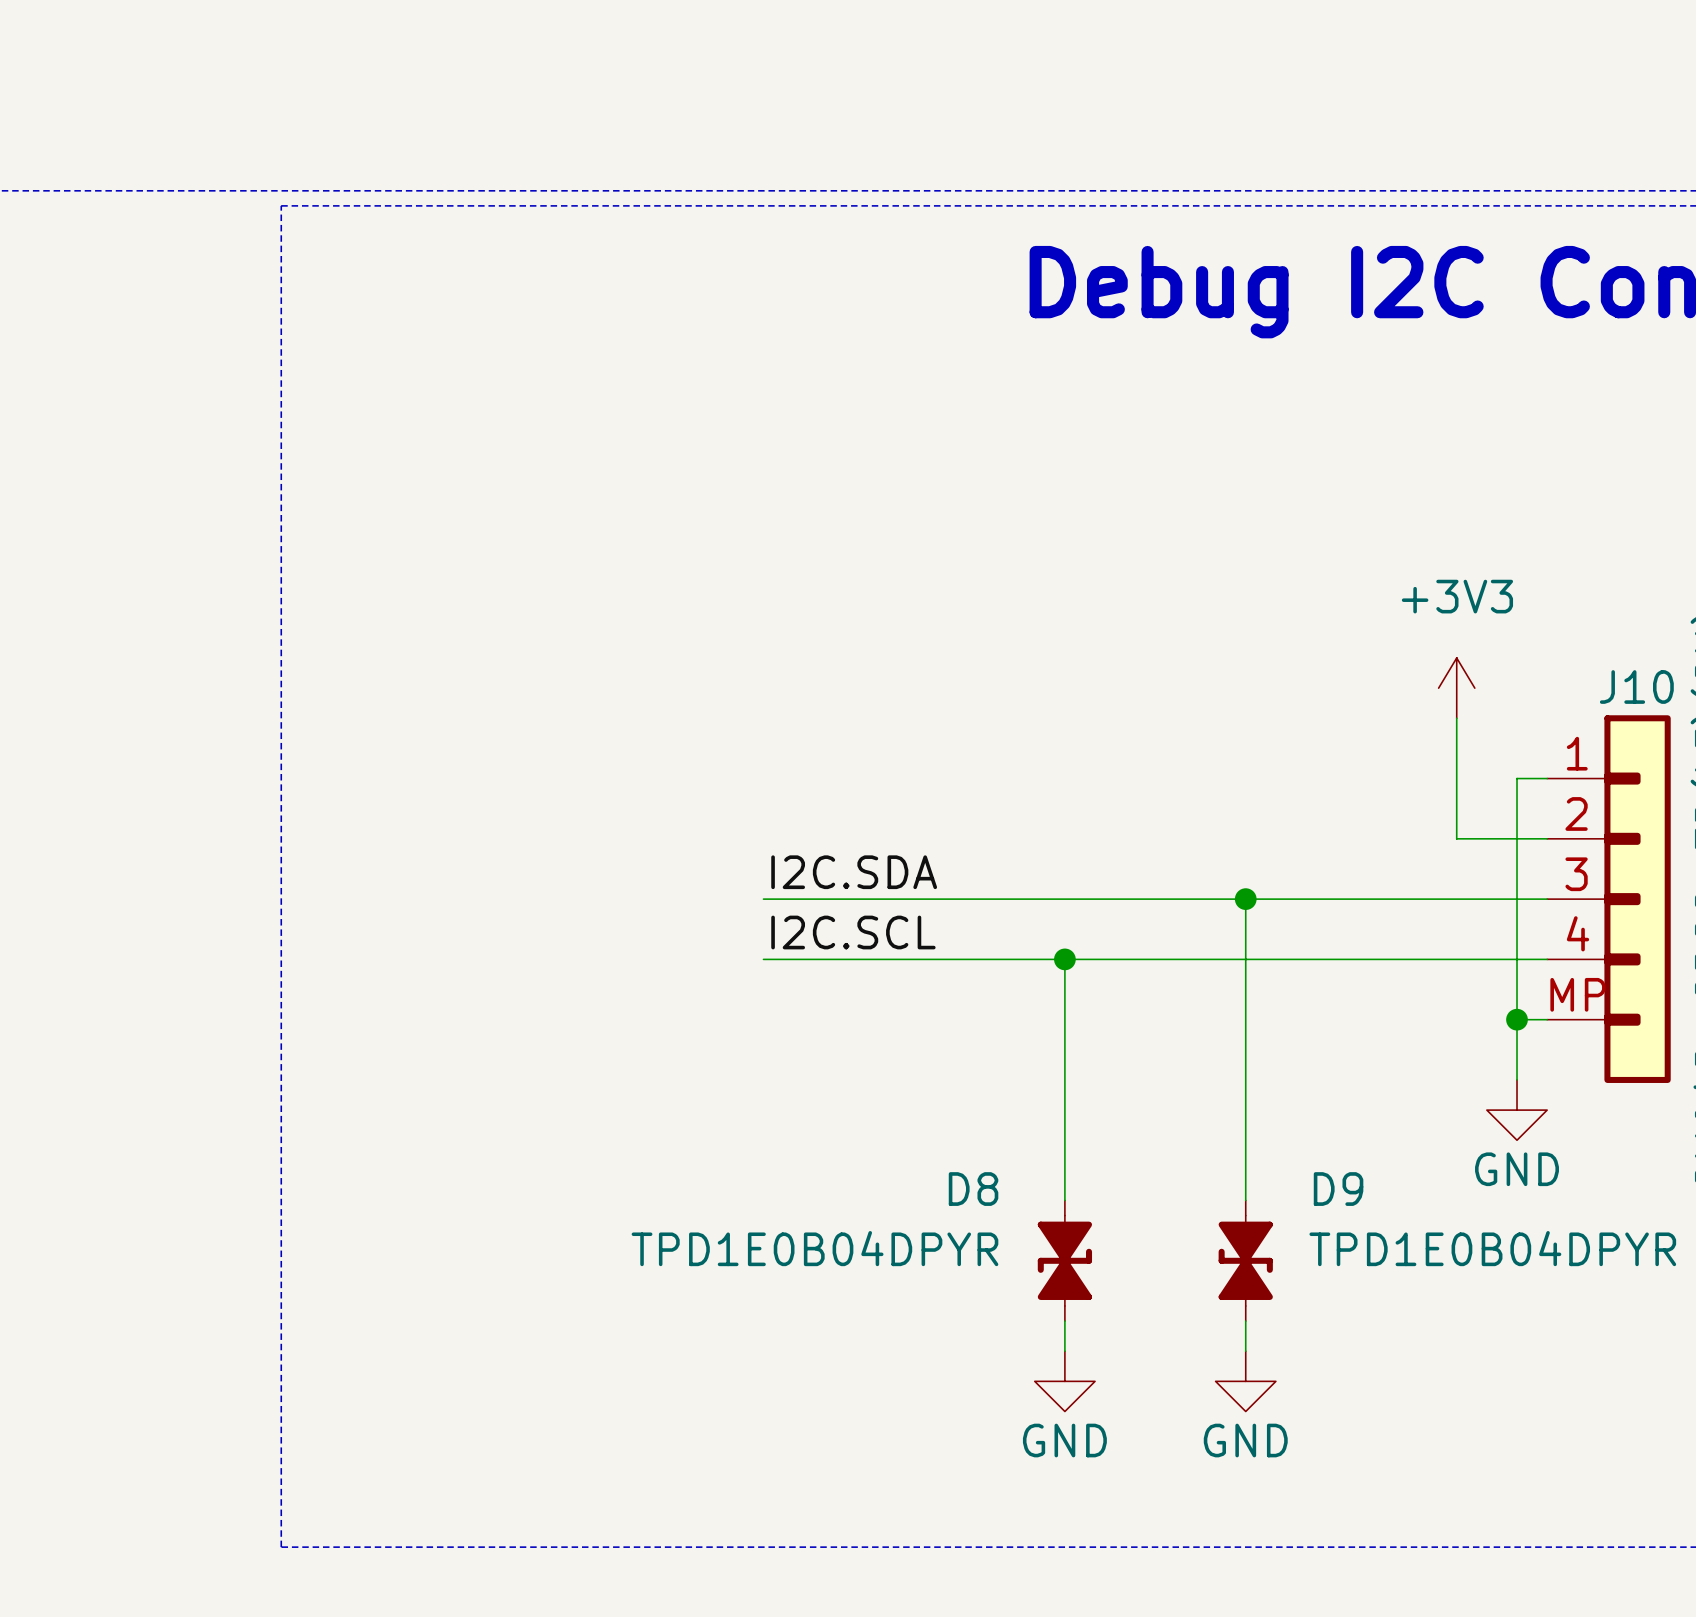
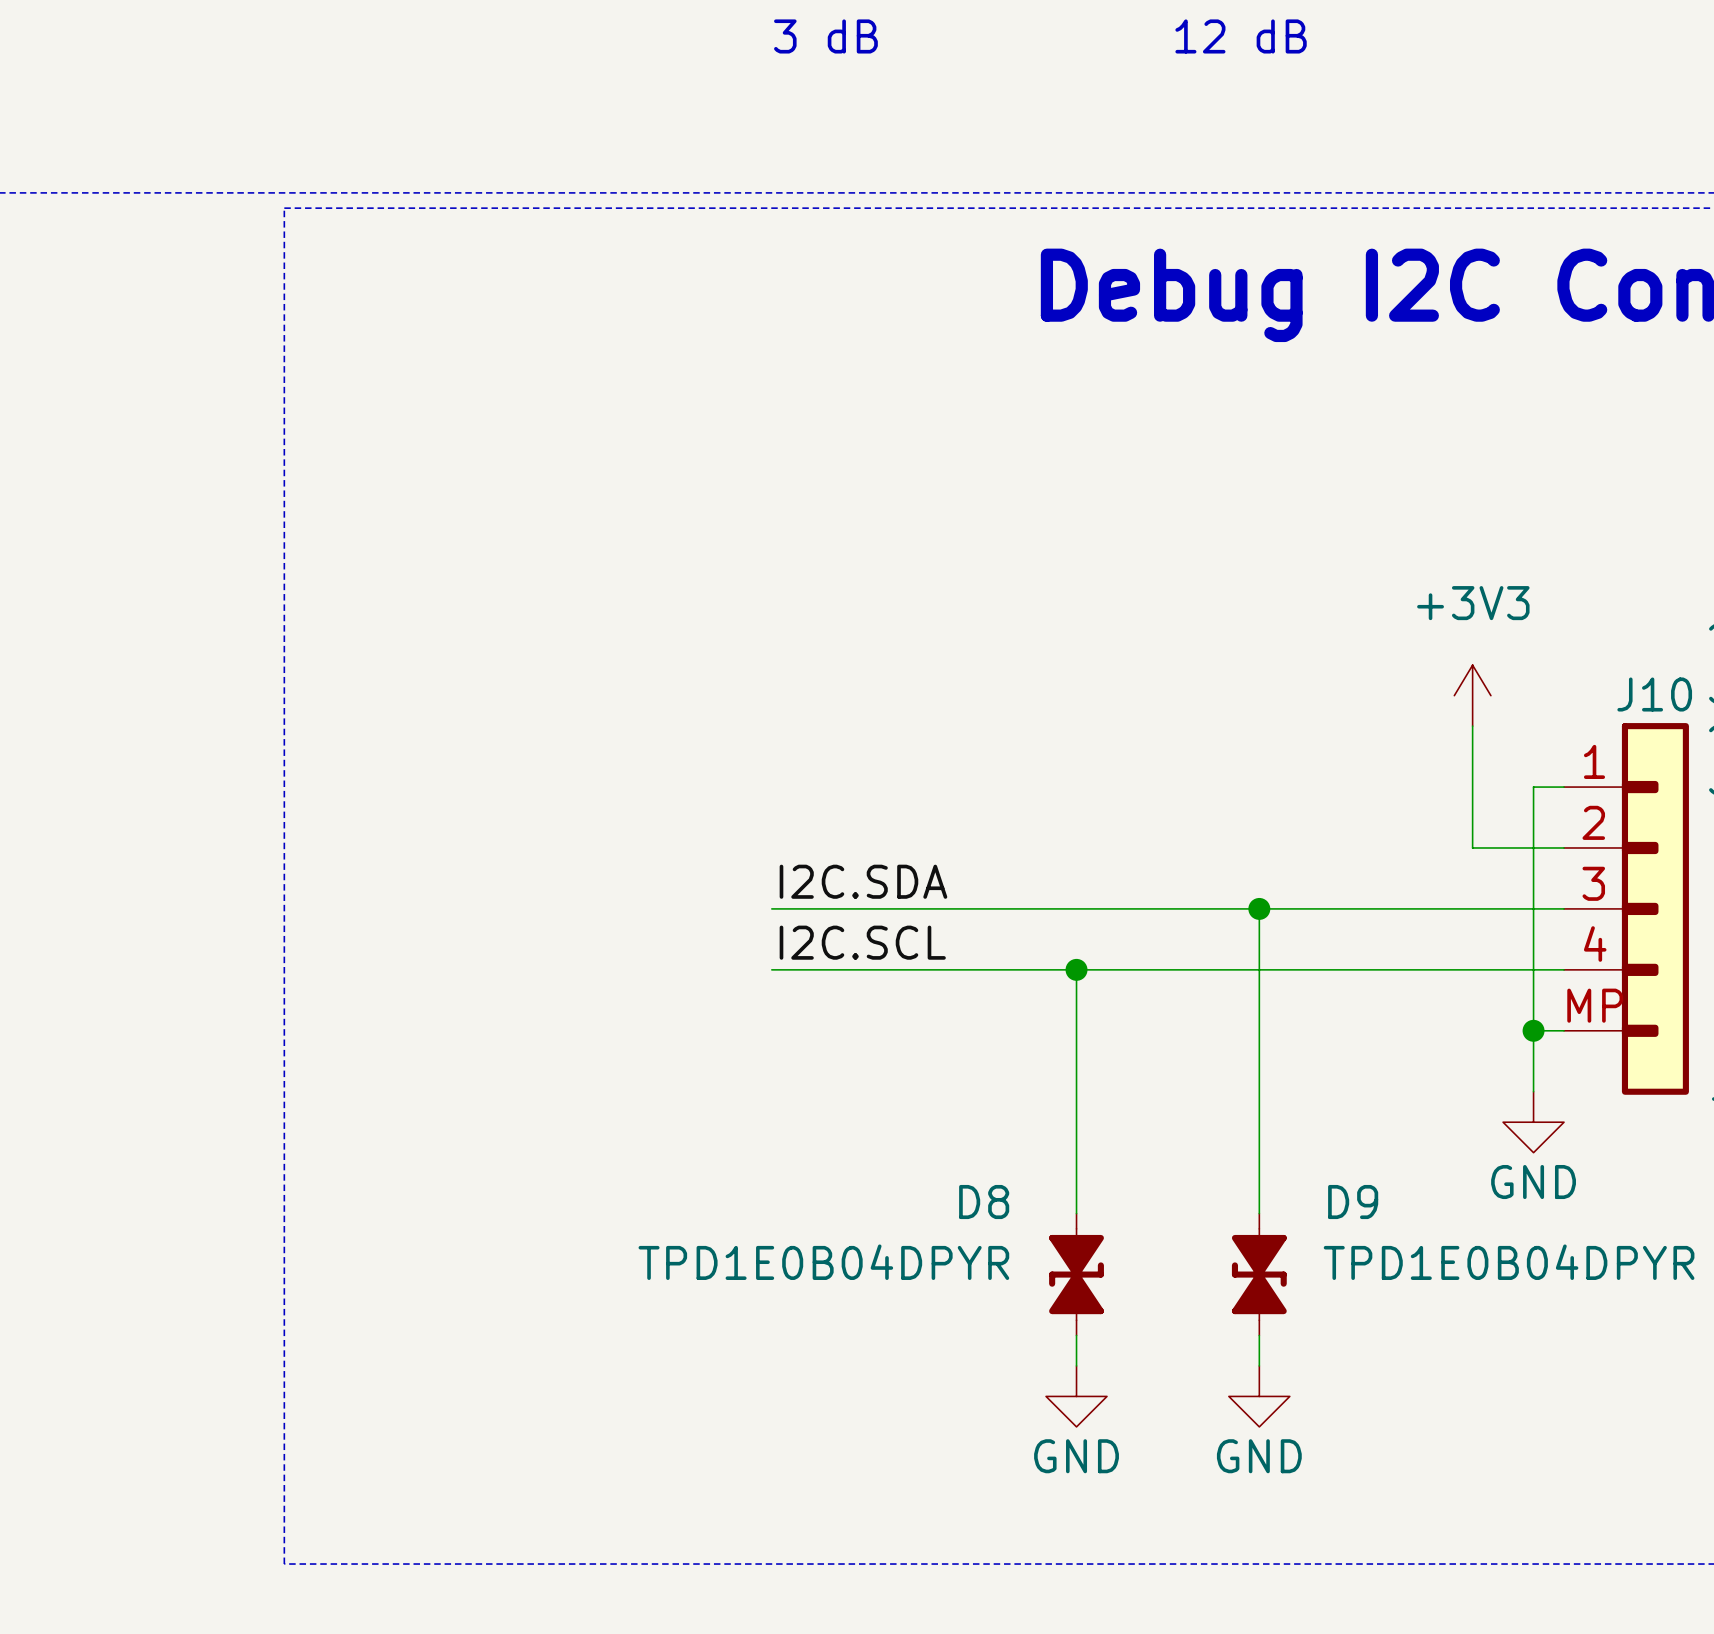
text: none -> 3 dB (825, 36)
text: none -> 12 dB (1241, 36)

